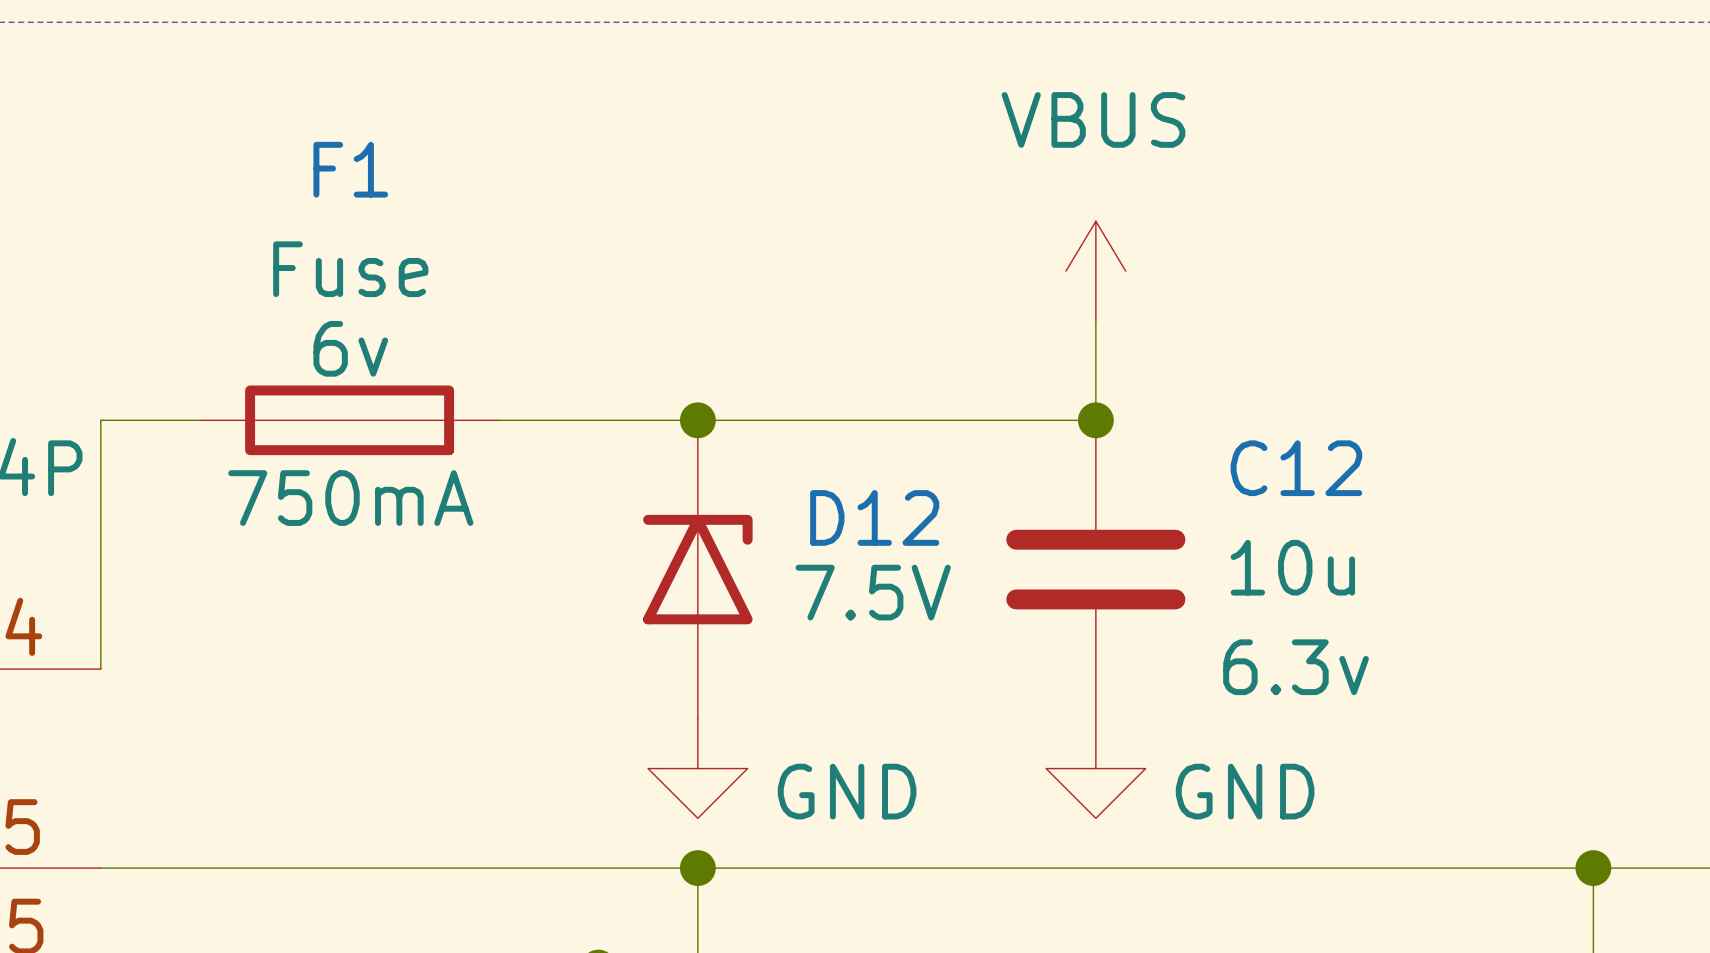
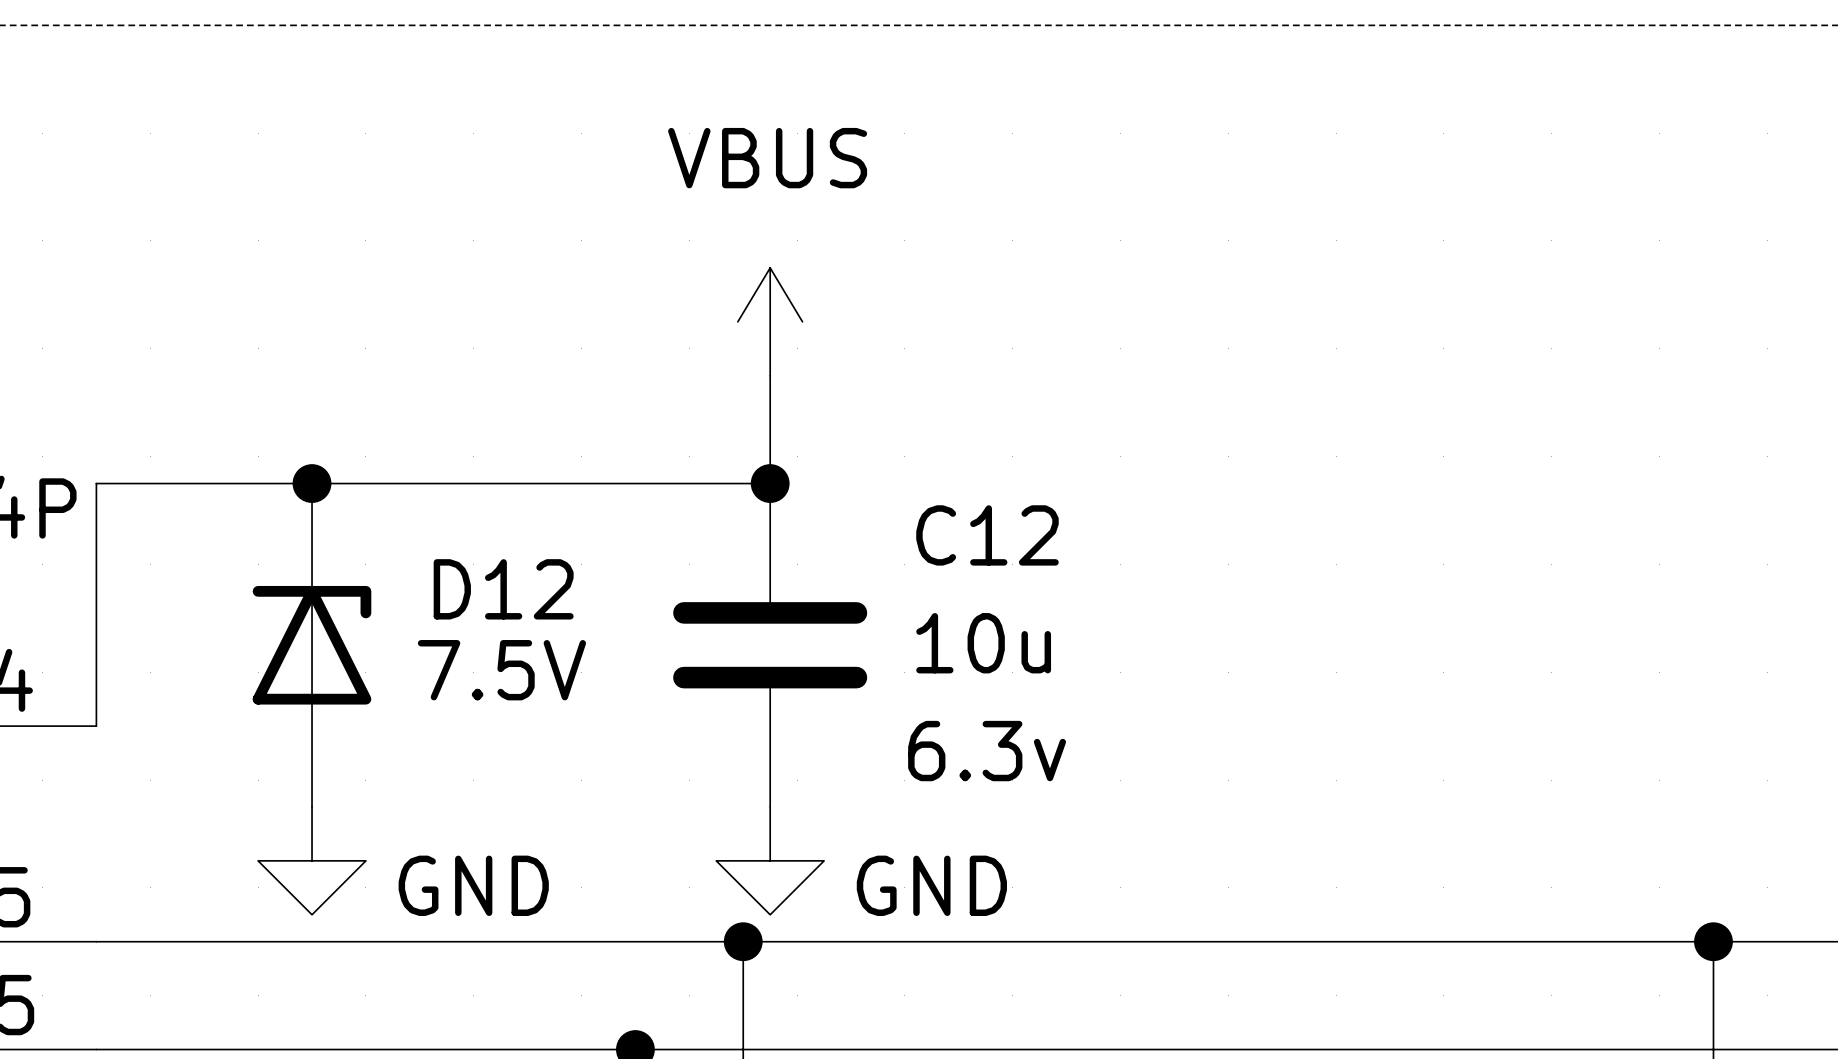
power symbol position: VBUS (1095, 271) -> VBUS (770, 321)
wire: (1095, 320) (1095, 420) (498, 420) -> none
wire: (200, 420) (100, 420) (100, 445) -> (770, 375) (770, 483) (96, 483)
F1: Fuse (349, 420) -> none
junction position: (697, 420) -> (770, 483)
junction: (1095, 420) -> none
junction: none -> (312, 483)
D12 position: (697, 569) -> (312, 645)
C12 position: (1095, 569) -> (770, 645)
power symbol position: GND (697, 768) -> GND (770, 860)
power symbol position: GND (1095, 768) -> GND (312, 860)

